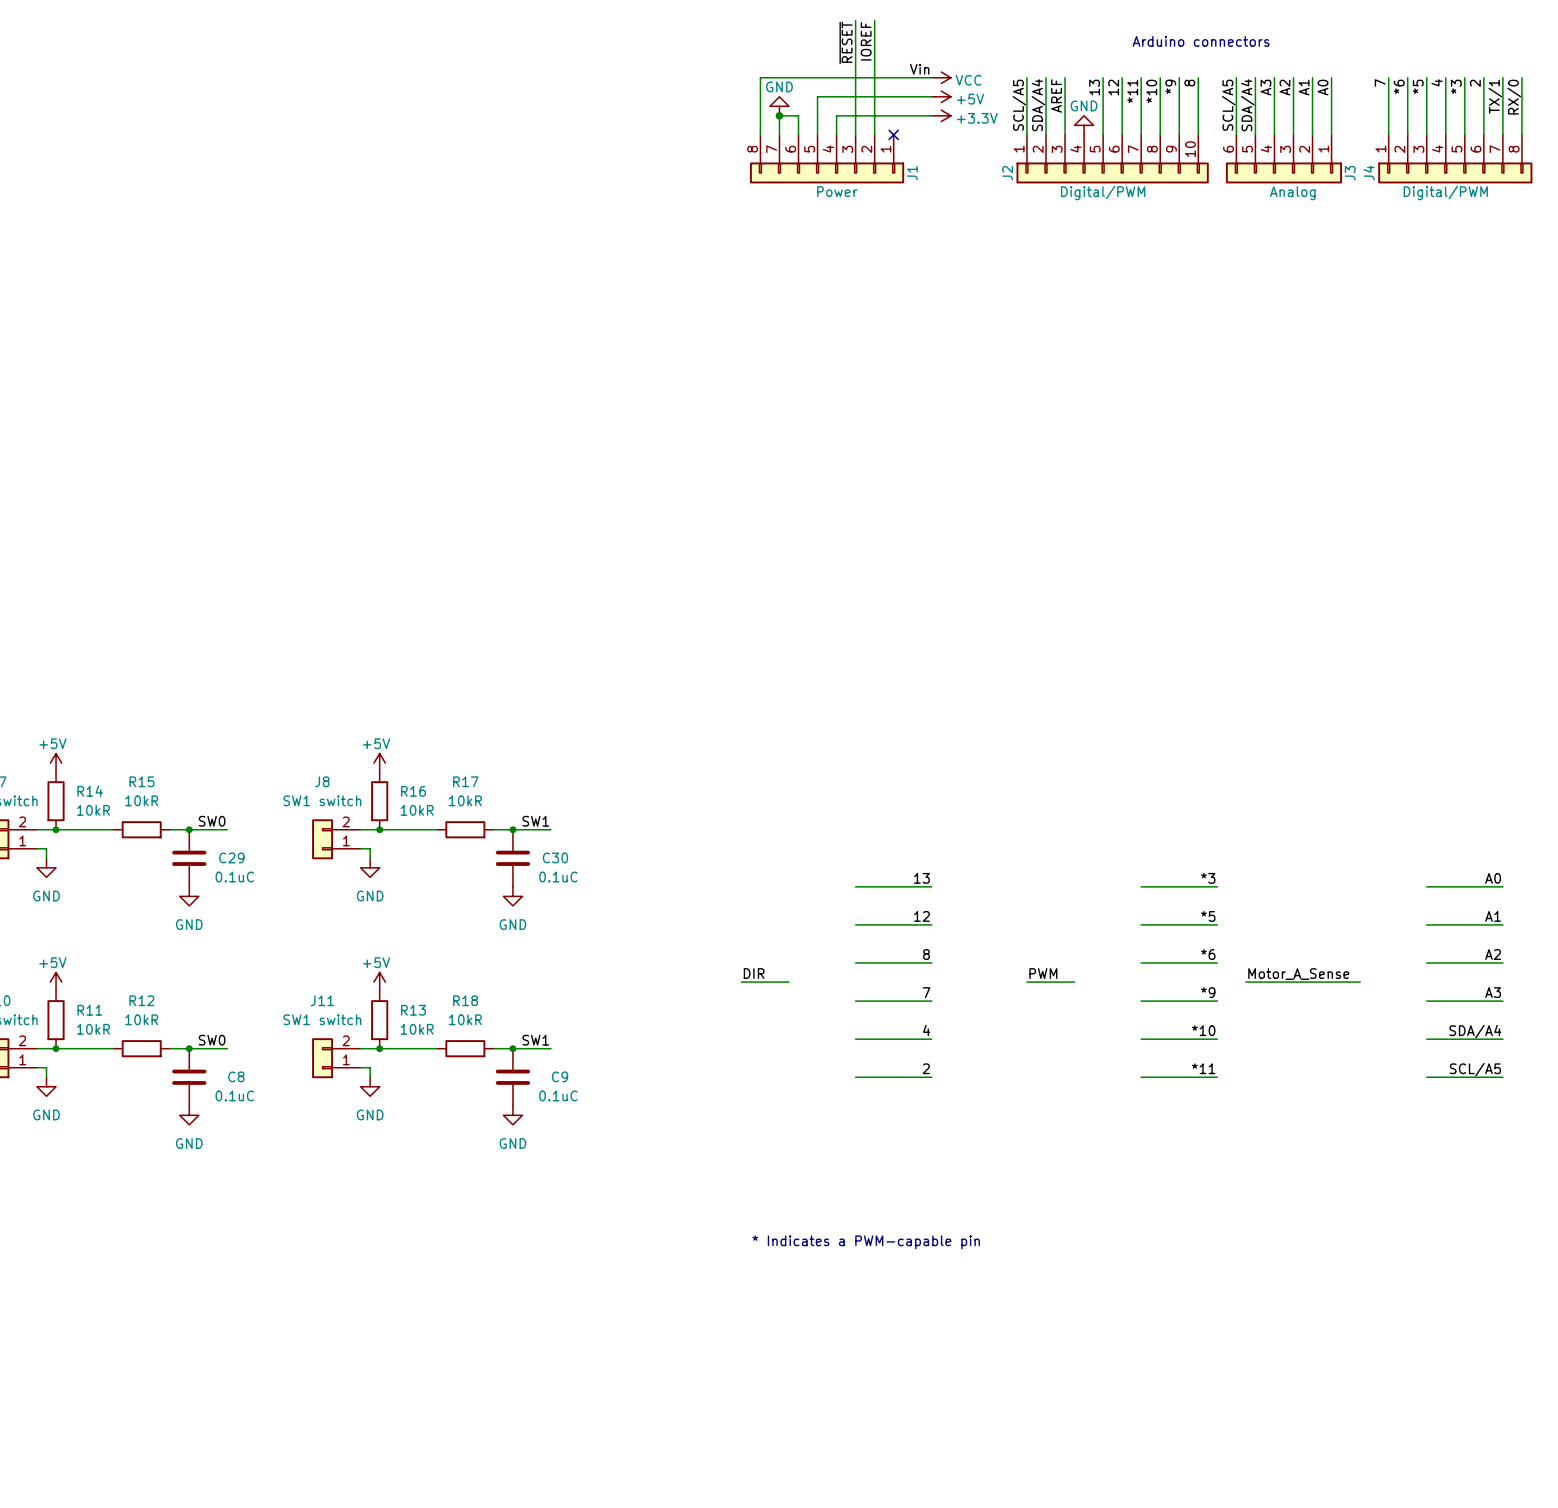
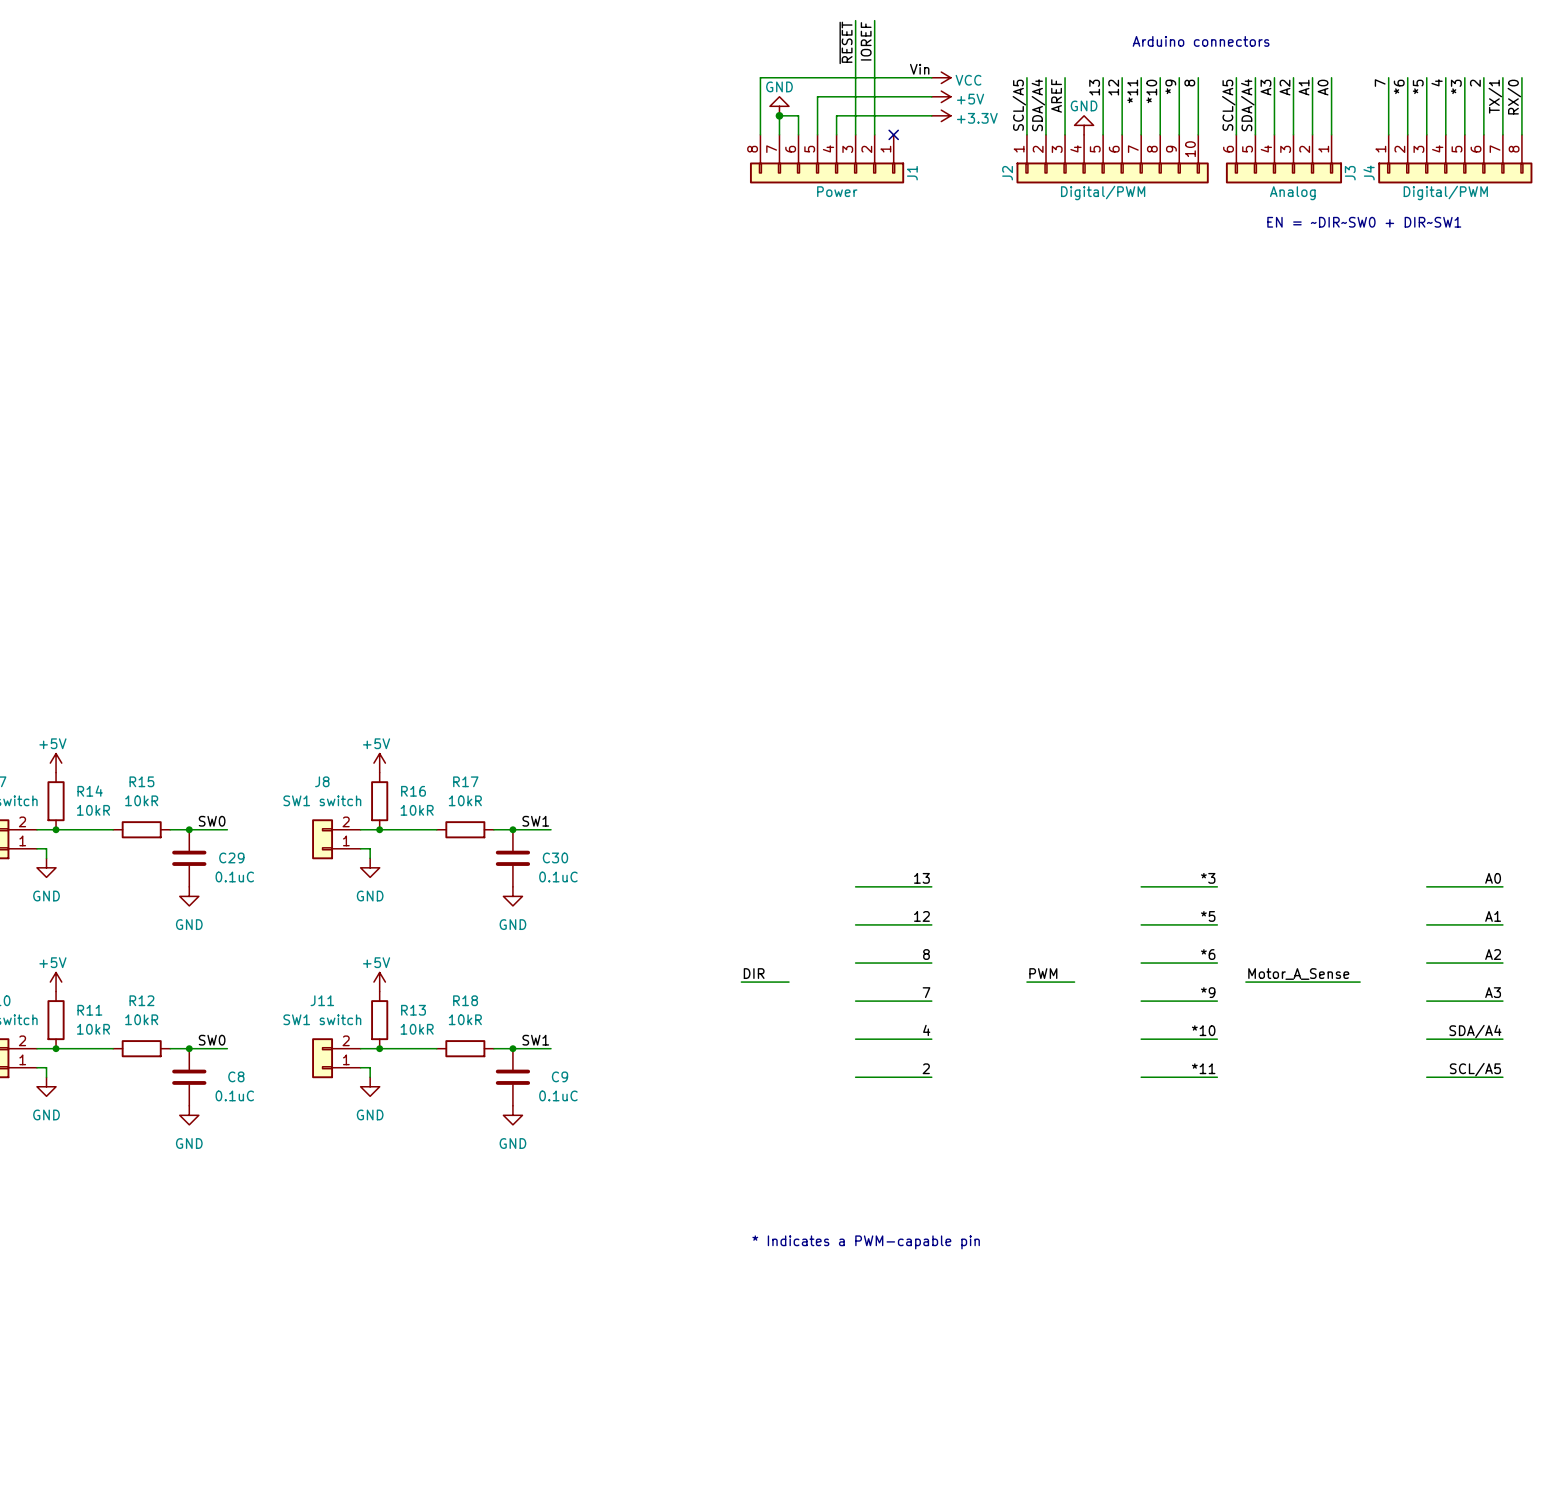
text: none -> EN = ~DIR~SW0 + DIR~SW1 (1364, 222)

